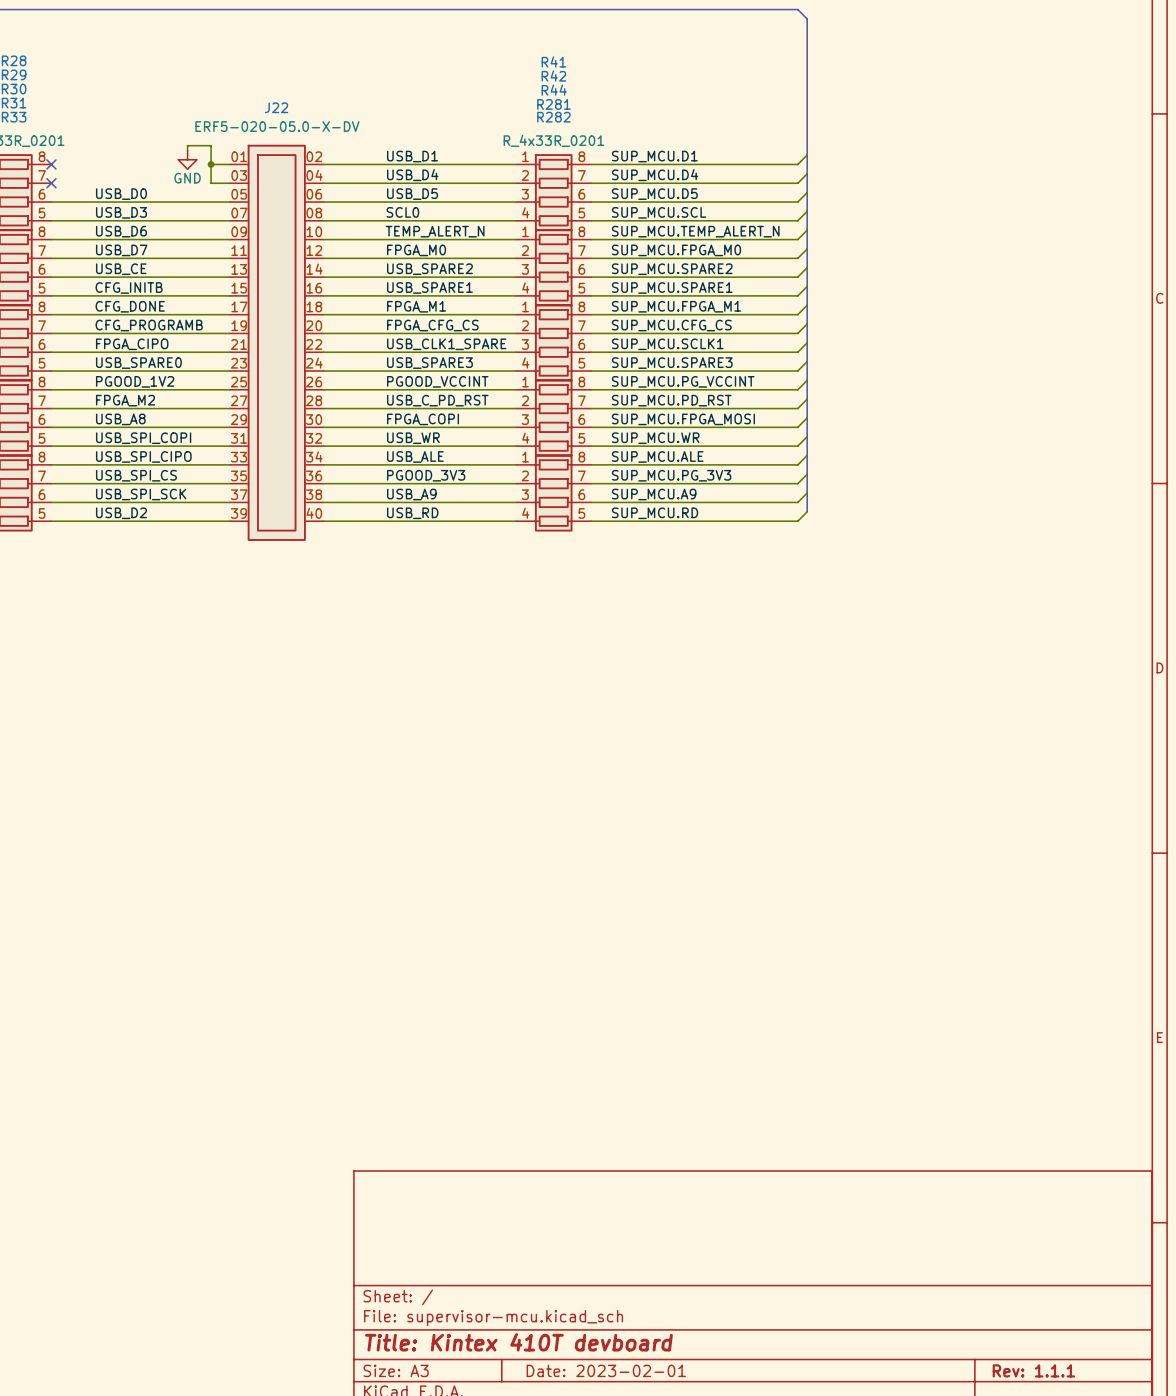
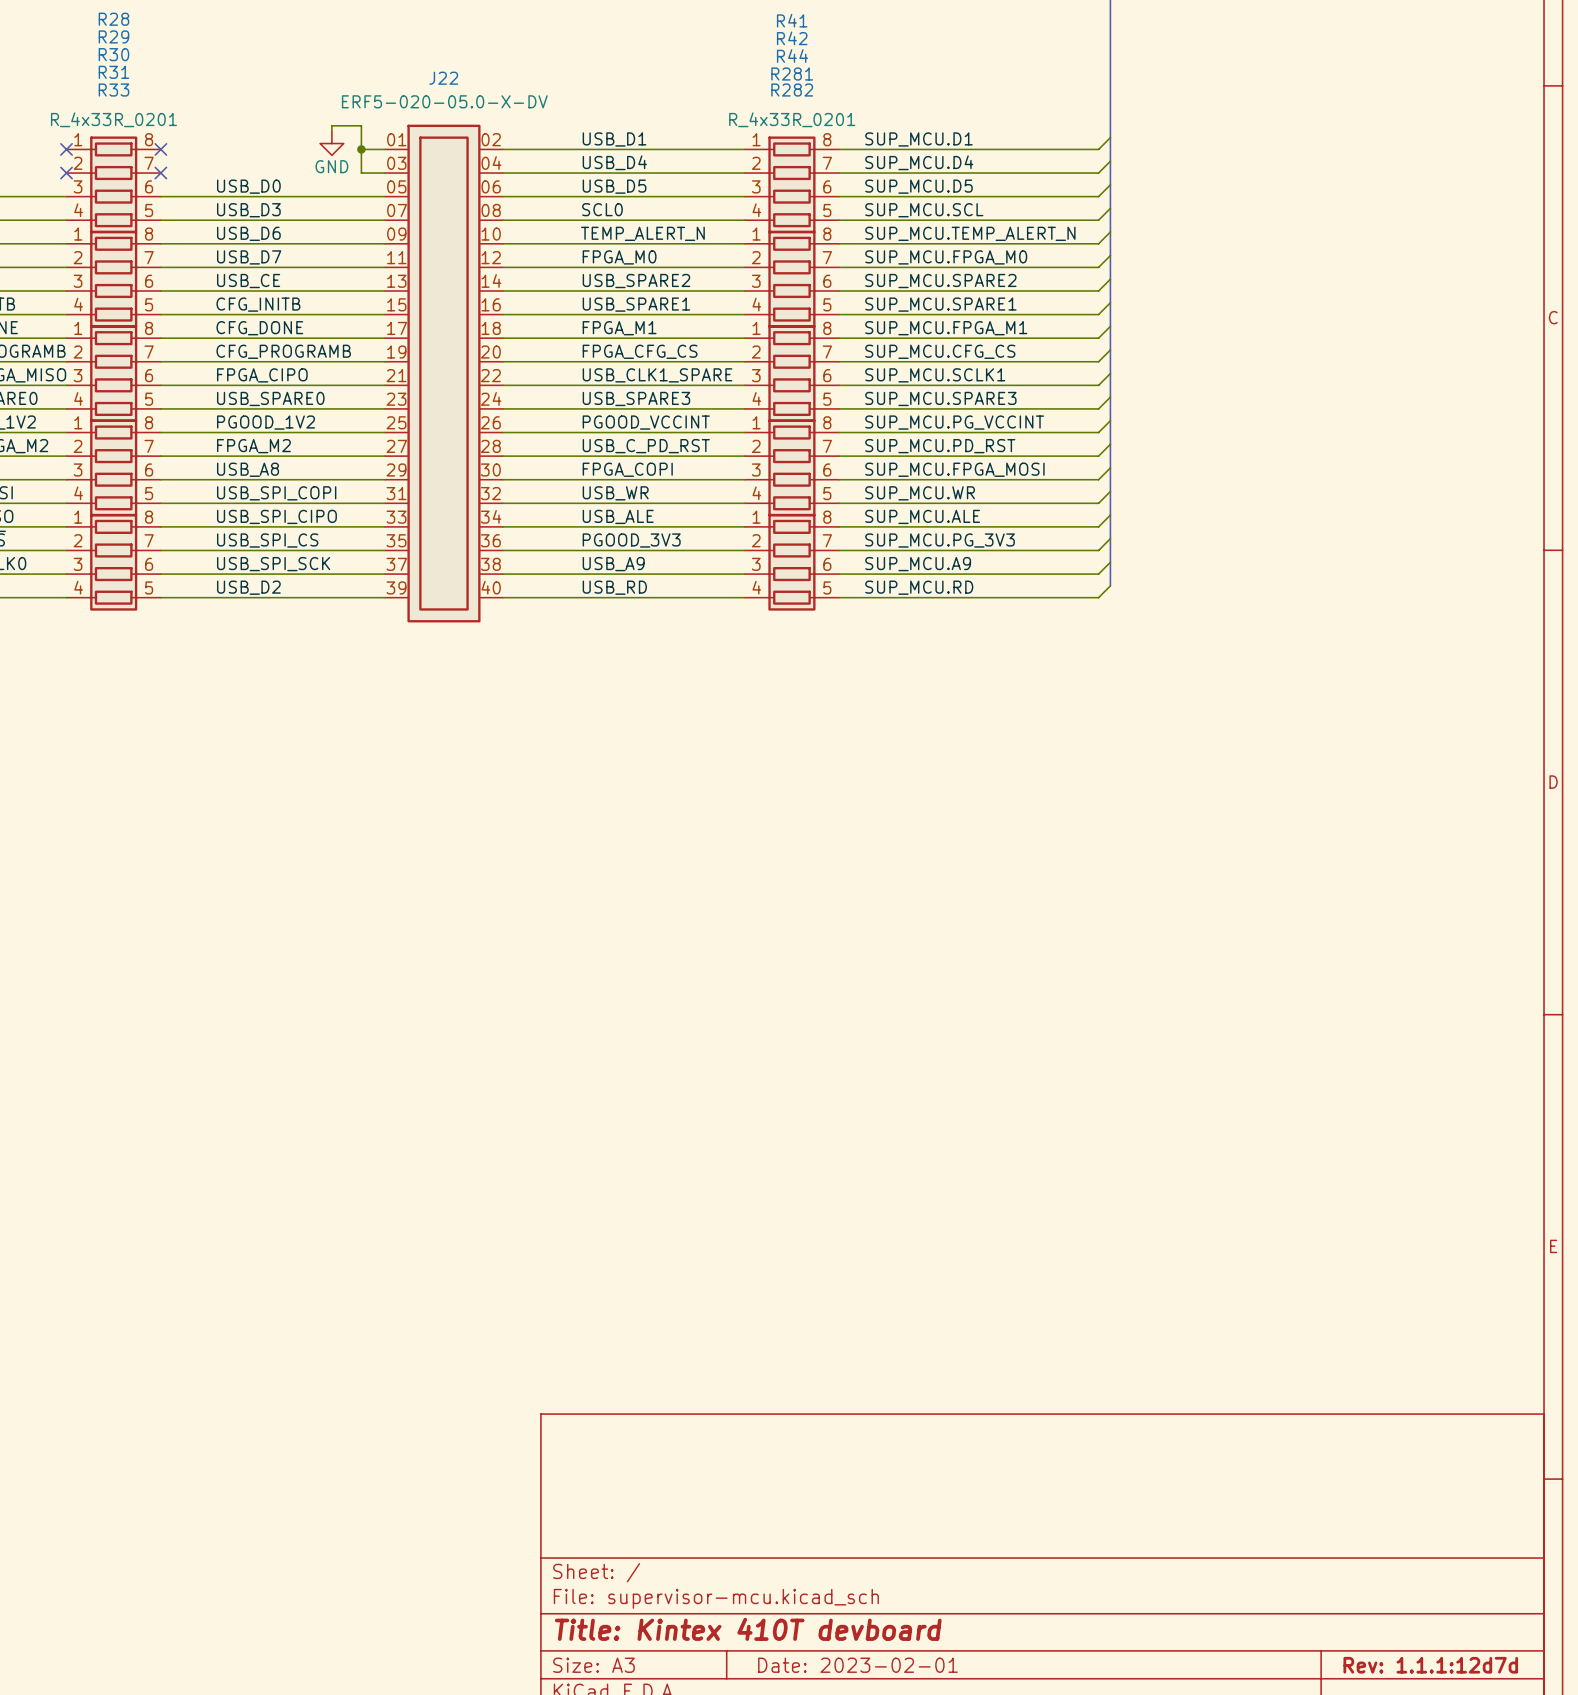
title block: Rev: 1.1.1 (1033, 1370) -> Rev: 1.1.1:12d7d (1430, 1665)

